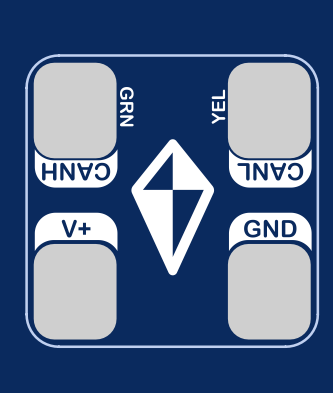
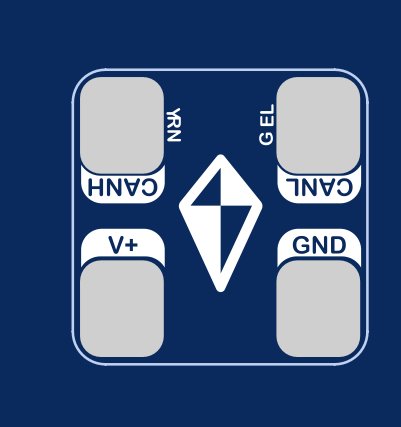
drawing shape: [120, 87, 134, 100] -> [166, 108, 181, 119]
drawing shape: [211, 113, 226, 124] -> [259, 132, 273, 146]

